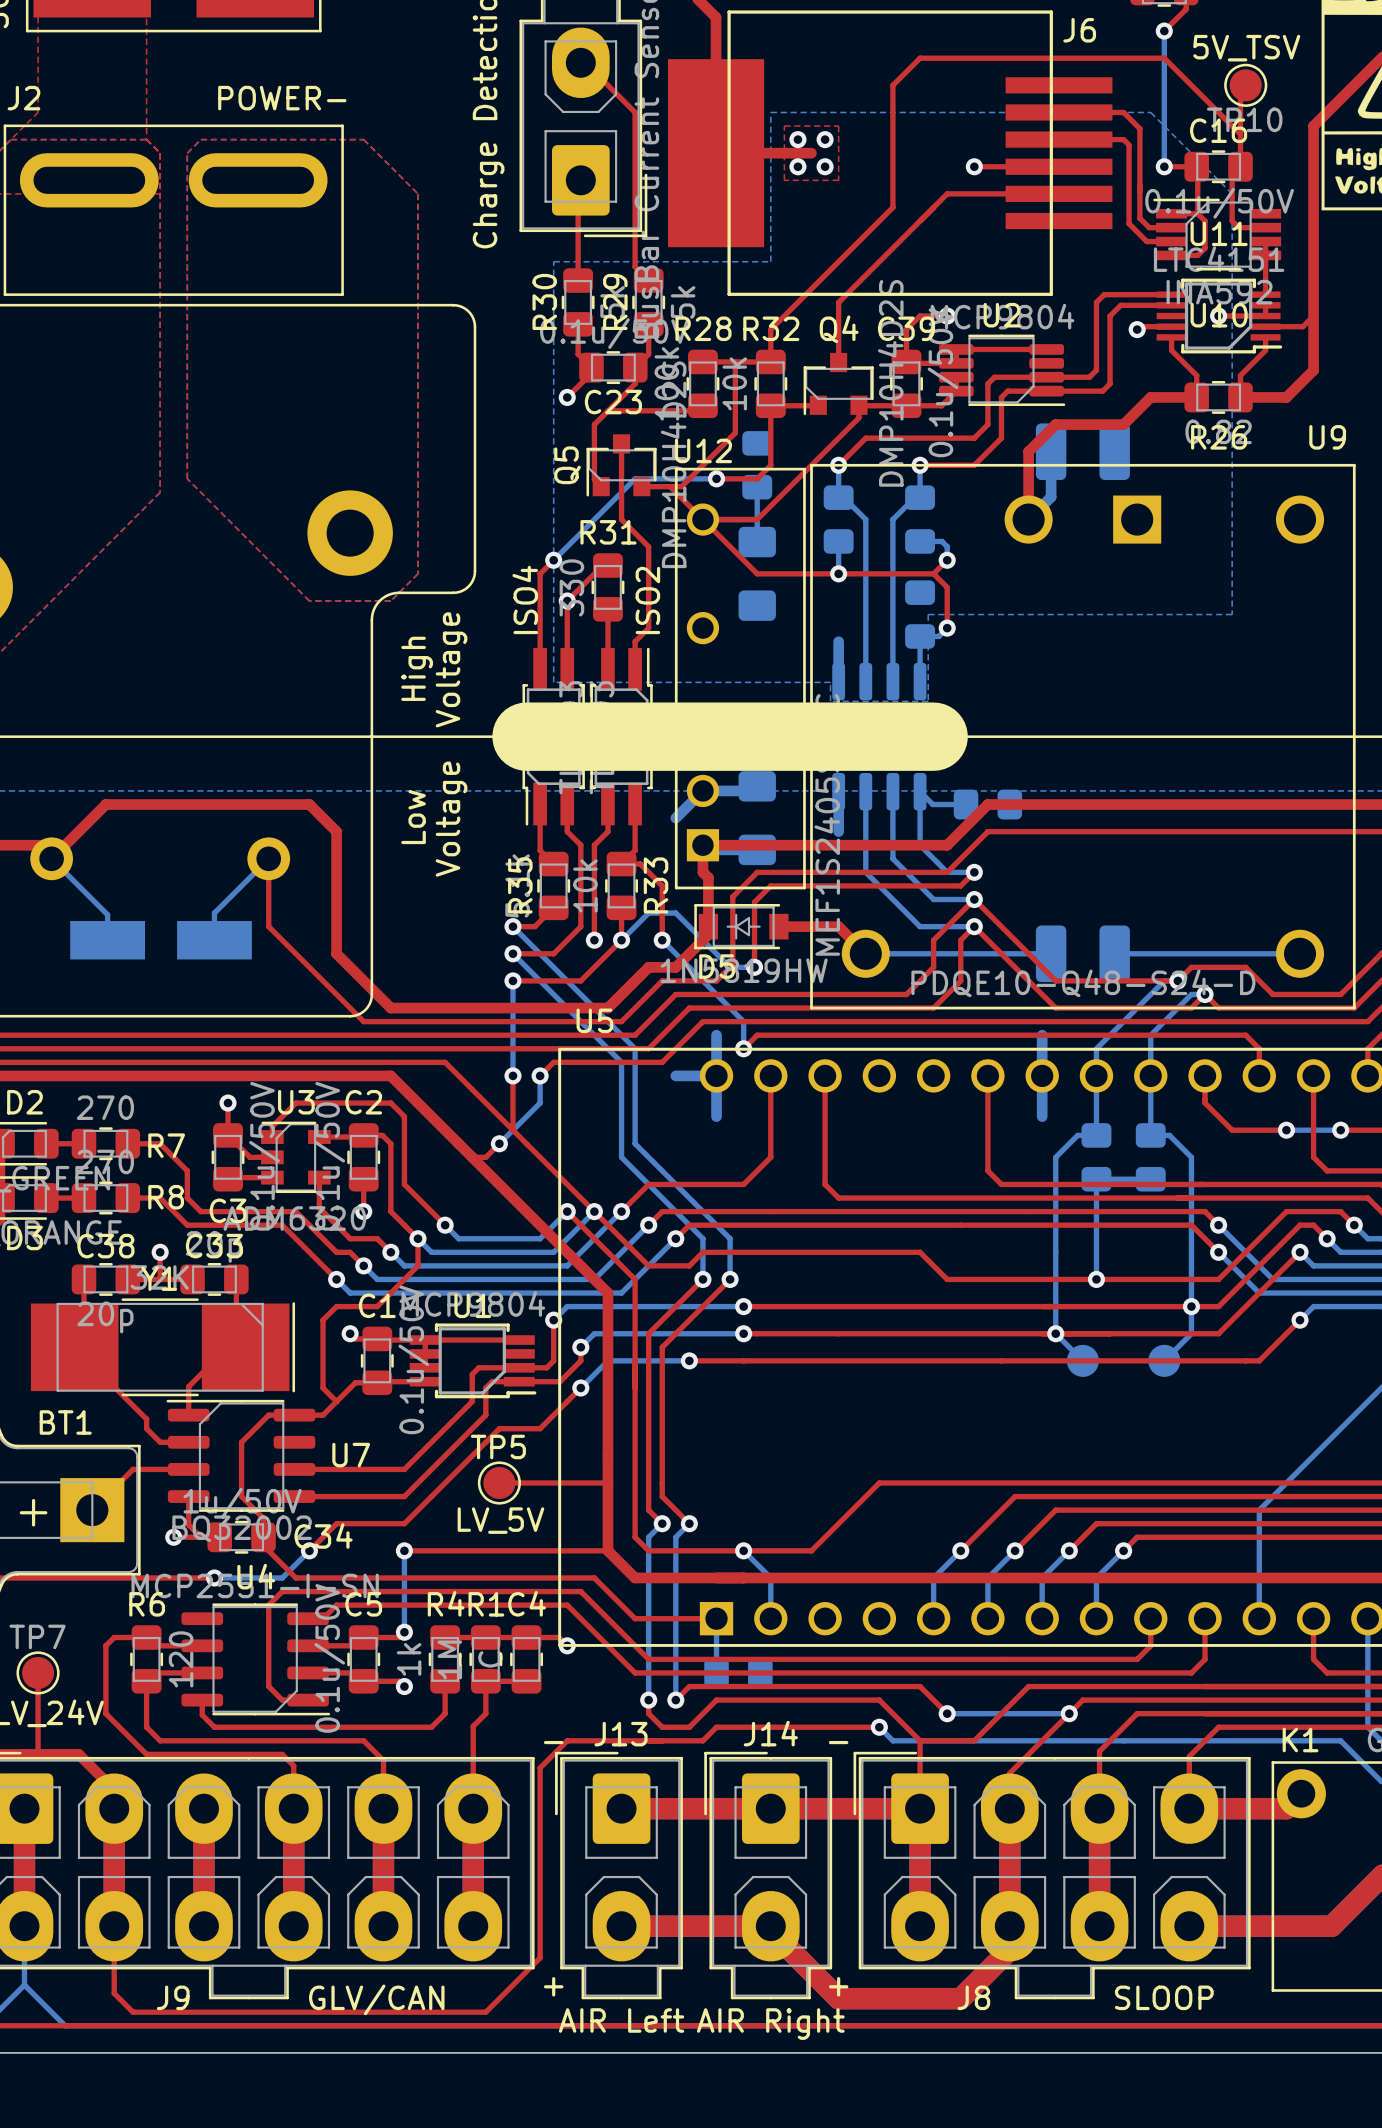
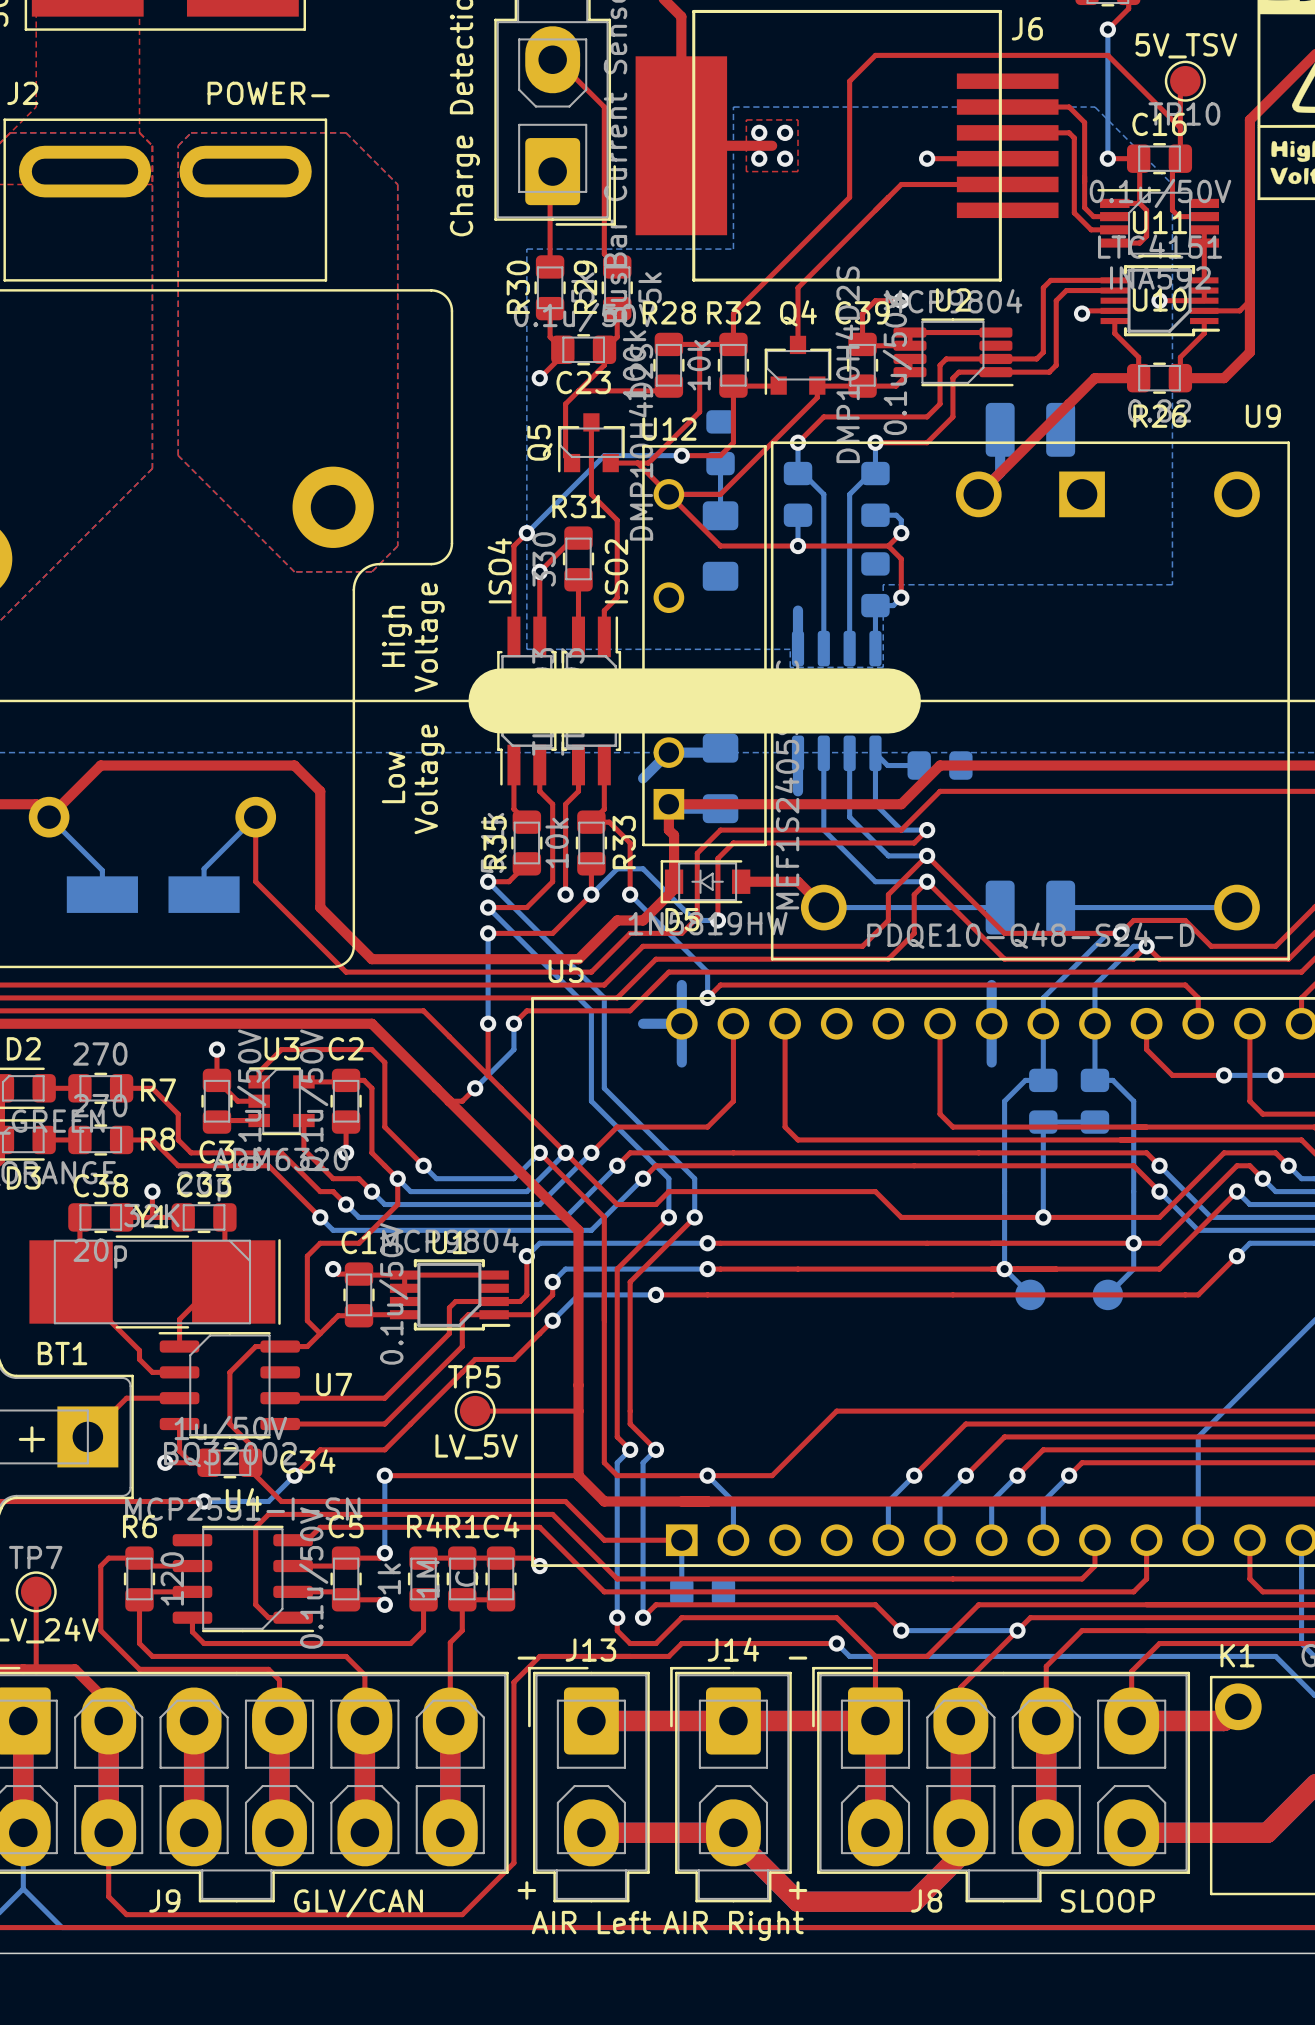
top track: (1123, 424) (1055, 424) (1028, 451) (1028, 519) -> (1069, 403) (978, 494)

